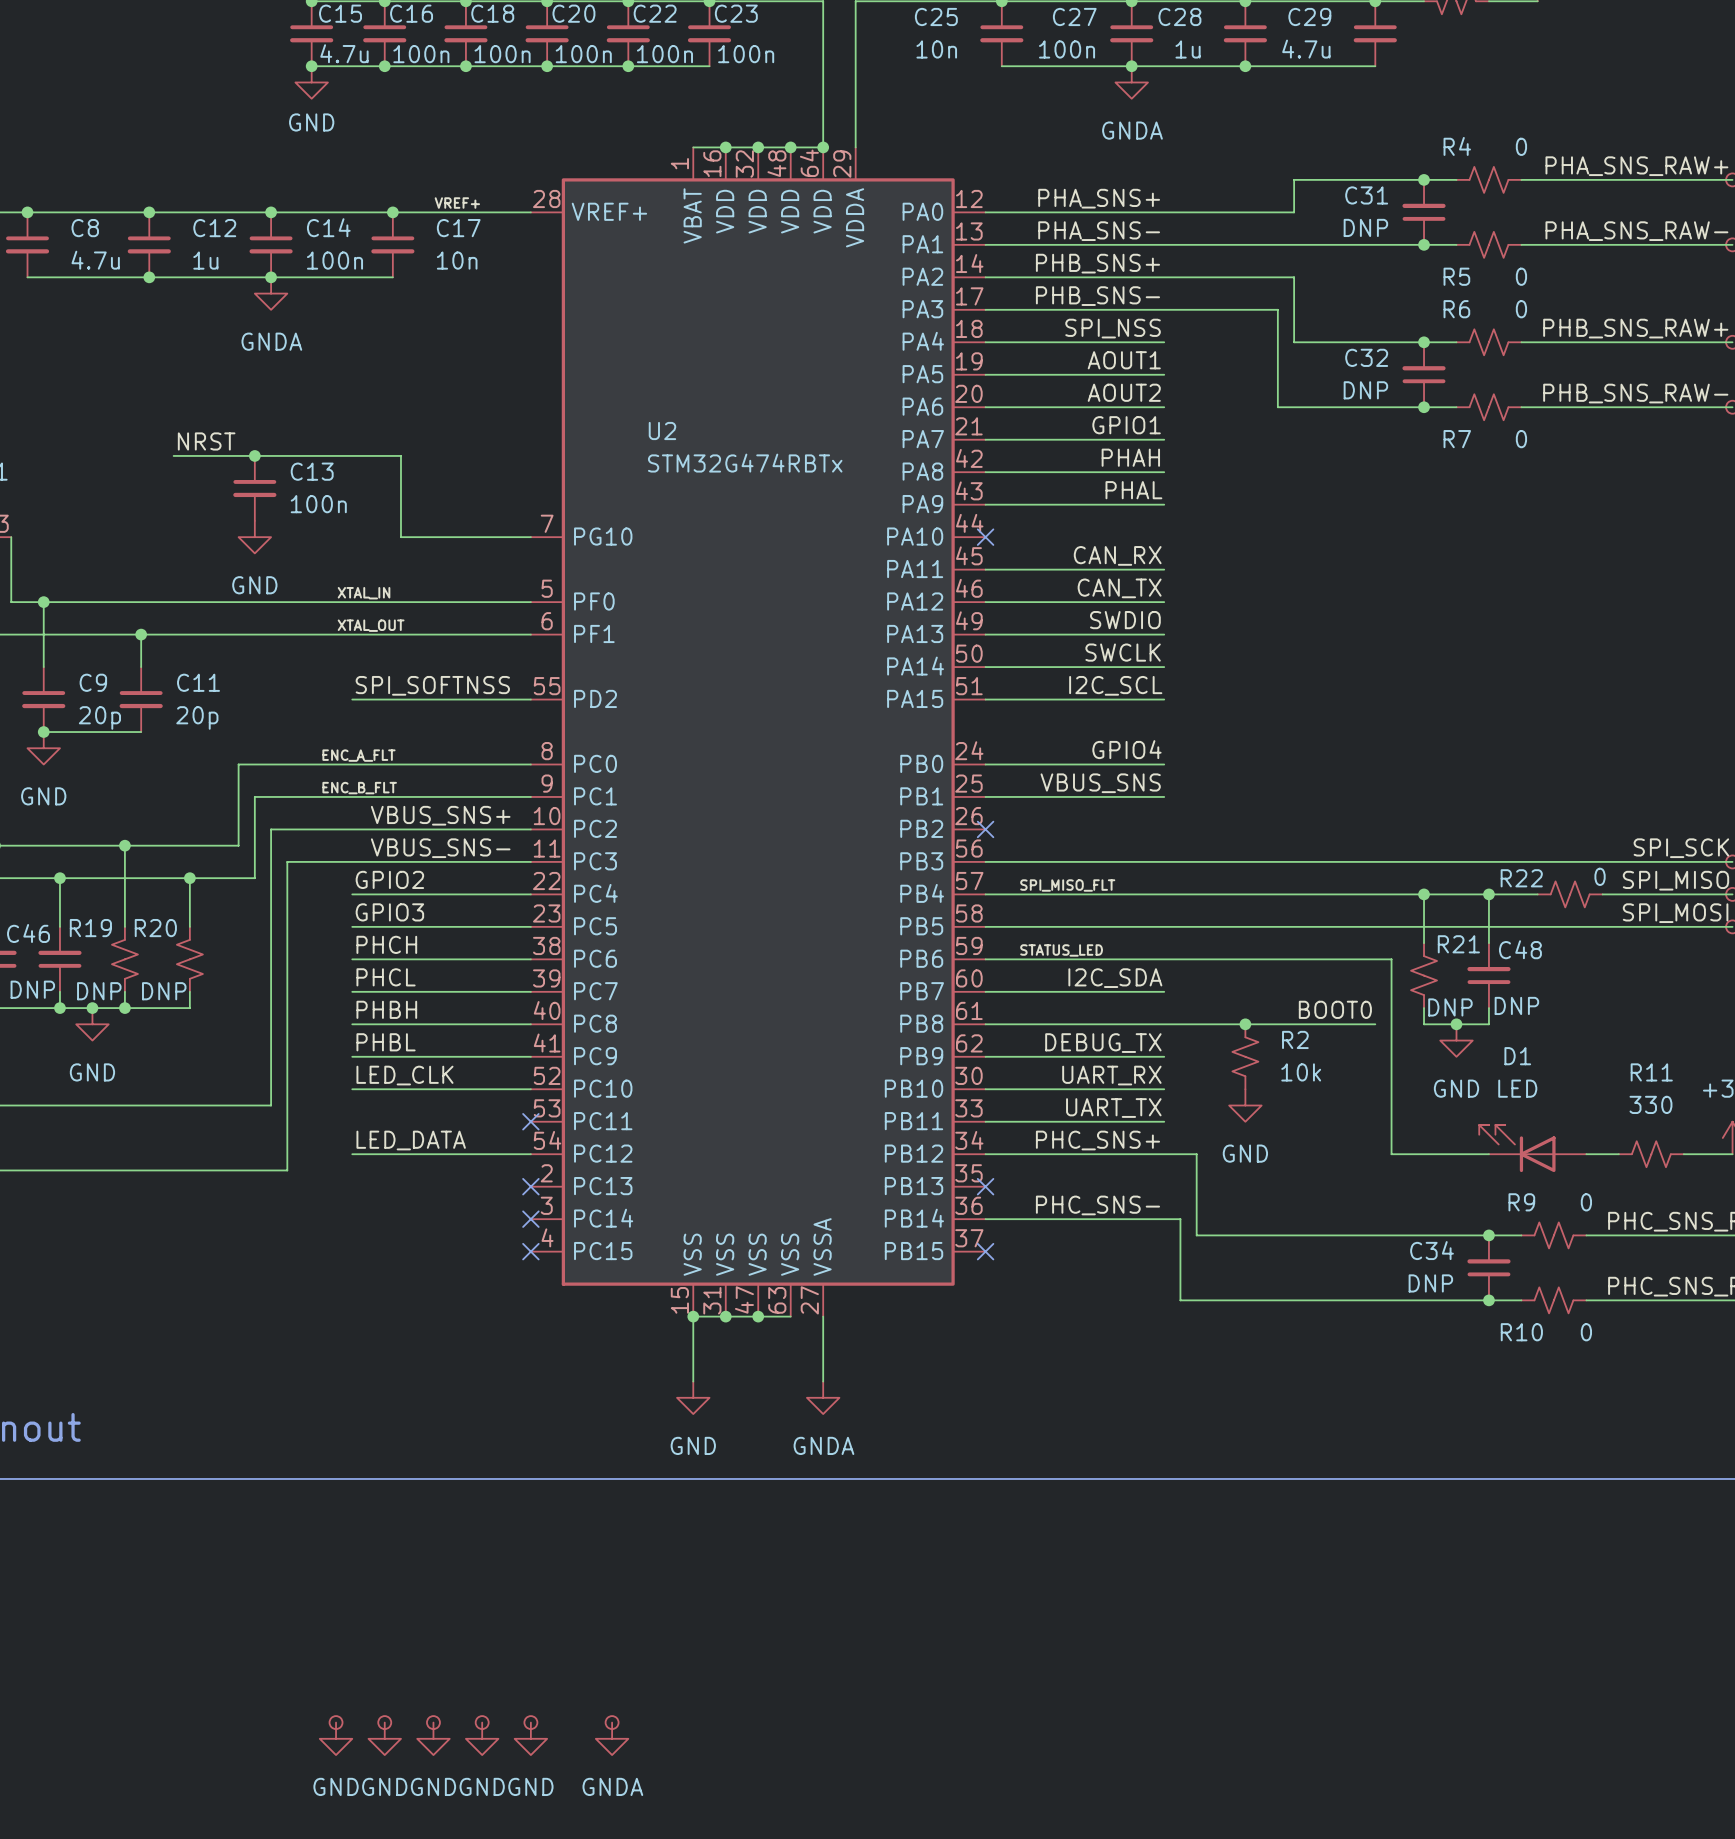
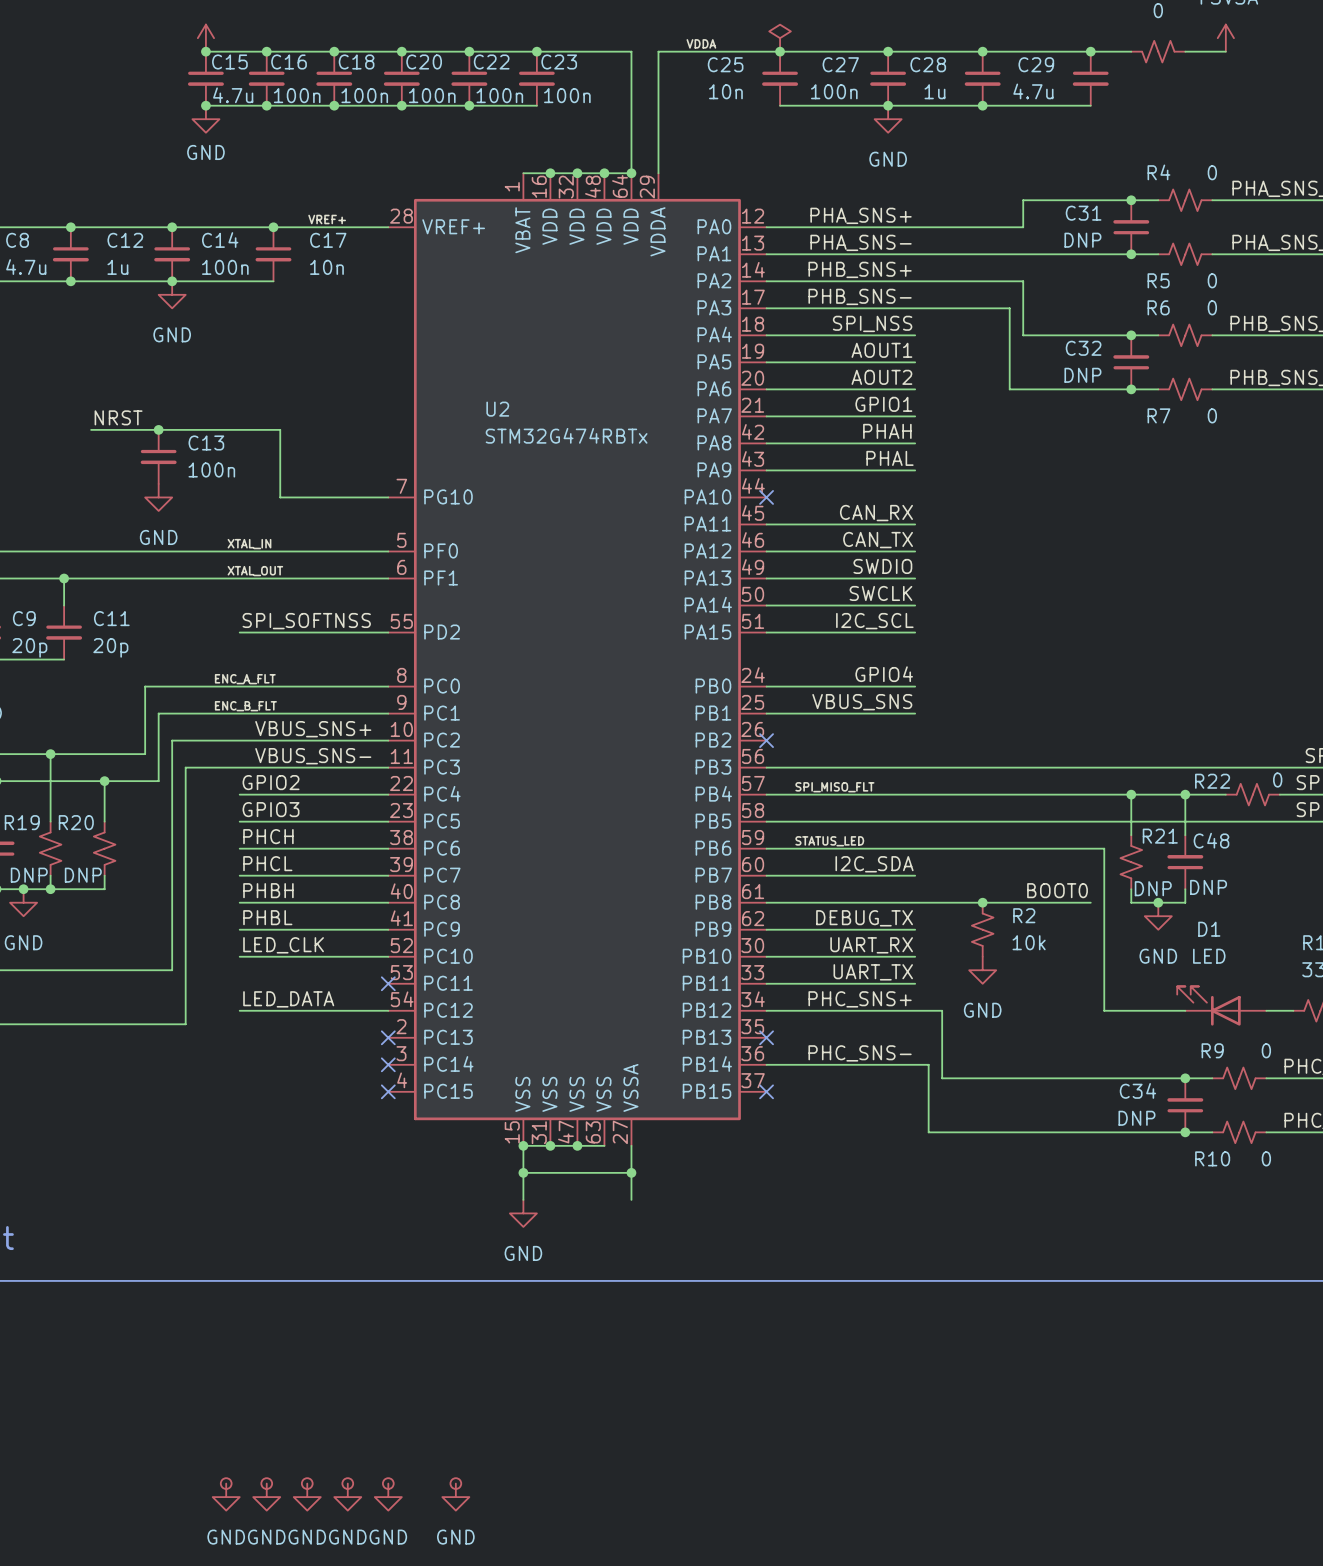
power symbol: GNDA (1131, 82) -> GND (888, 119)
power symbol: GNDA (271, 293) -> GND (172, 294)
wire: none -> (523, 1172) (631, 1172)
junction: none -> (523, 1172)
junction: none -> (631, 1172)
power symbol: GNDA (823, 1397) -> none
power symbol: GNDA (612, 1738) -> GND (455, 1497)

